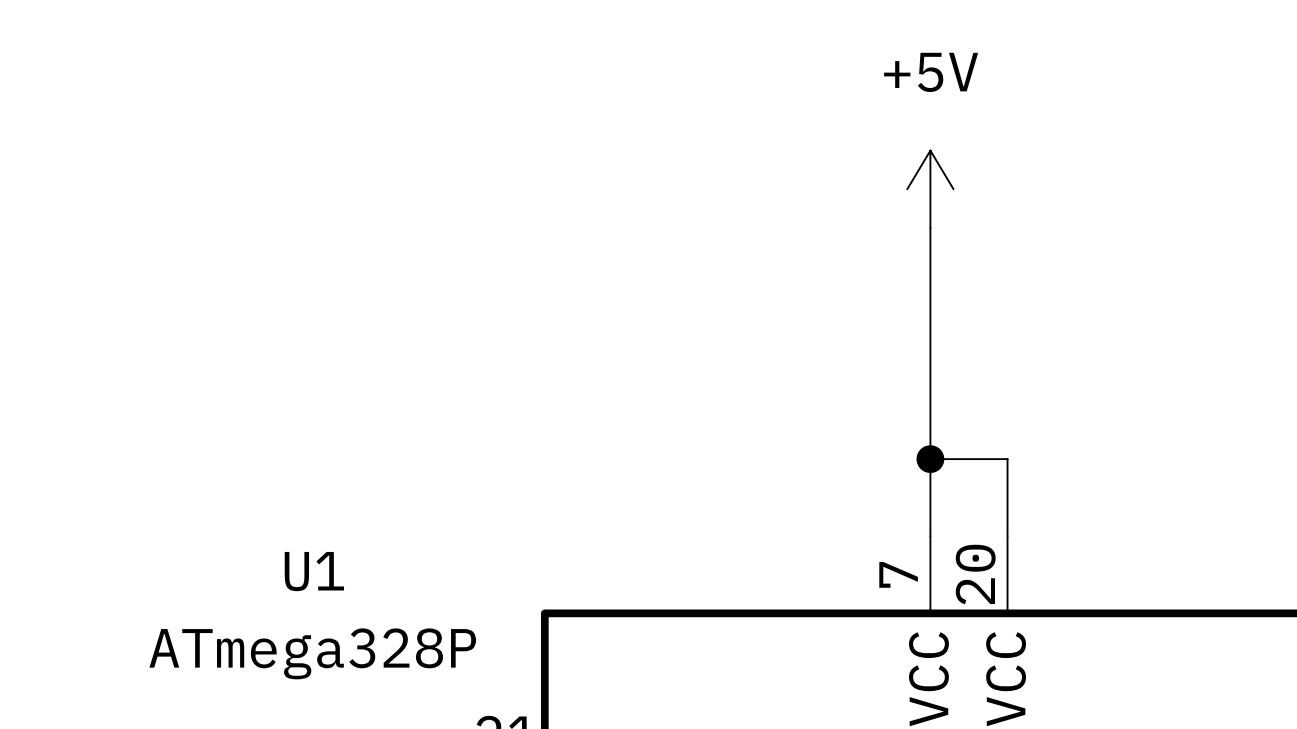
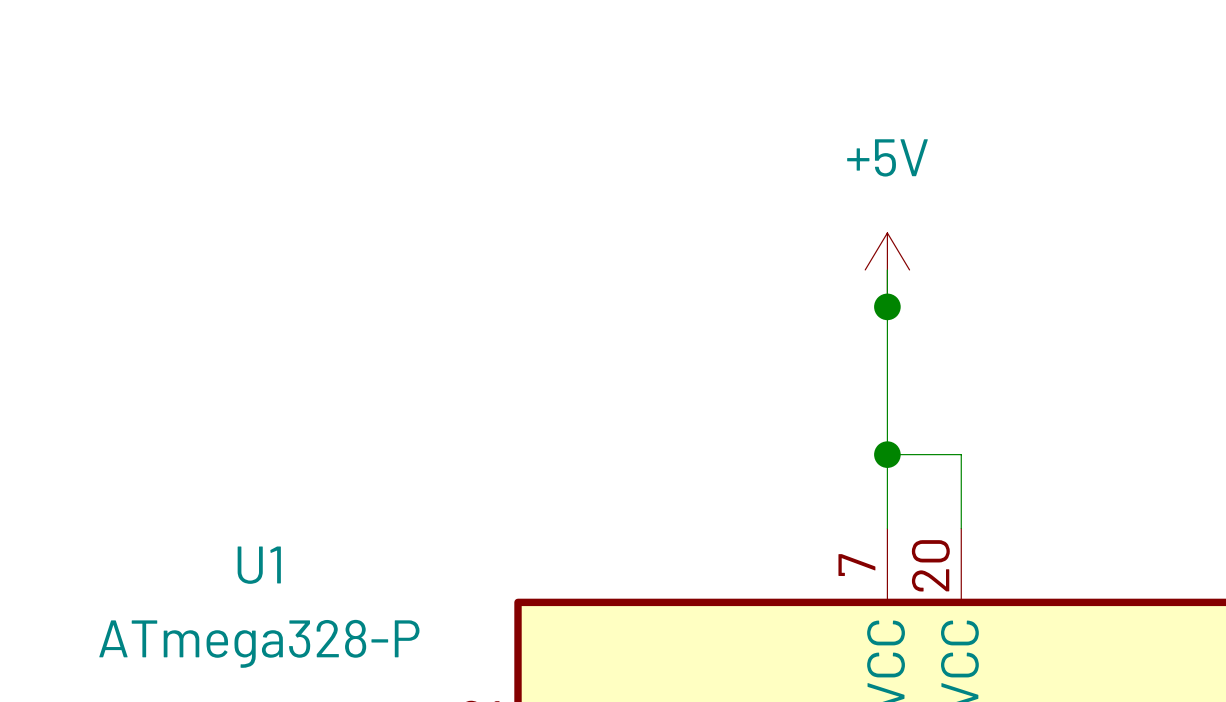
power symbol position: +5V (930, 189) -> +5V (887, 269)
junction: none -> (887, 306)
U1 name position: U1 (314, 571) -> U1 (259, 565)
U1 value: ATmega328P (312, 653) -> ATmega328-P (259, 643)

